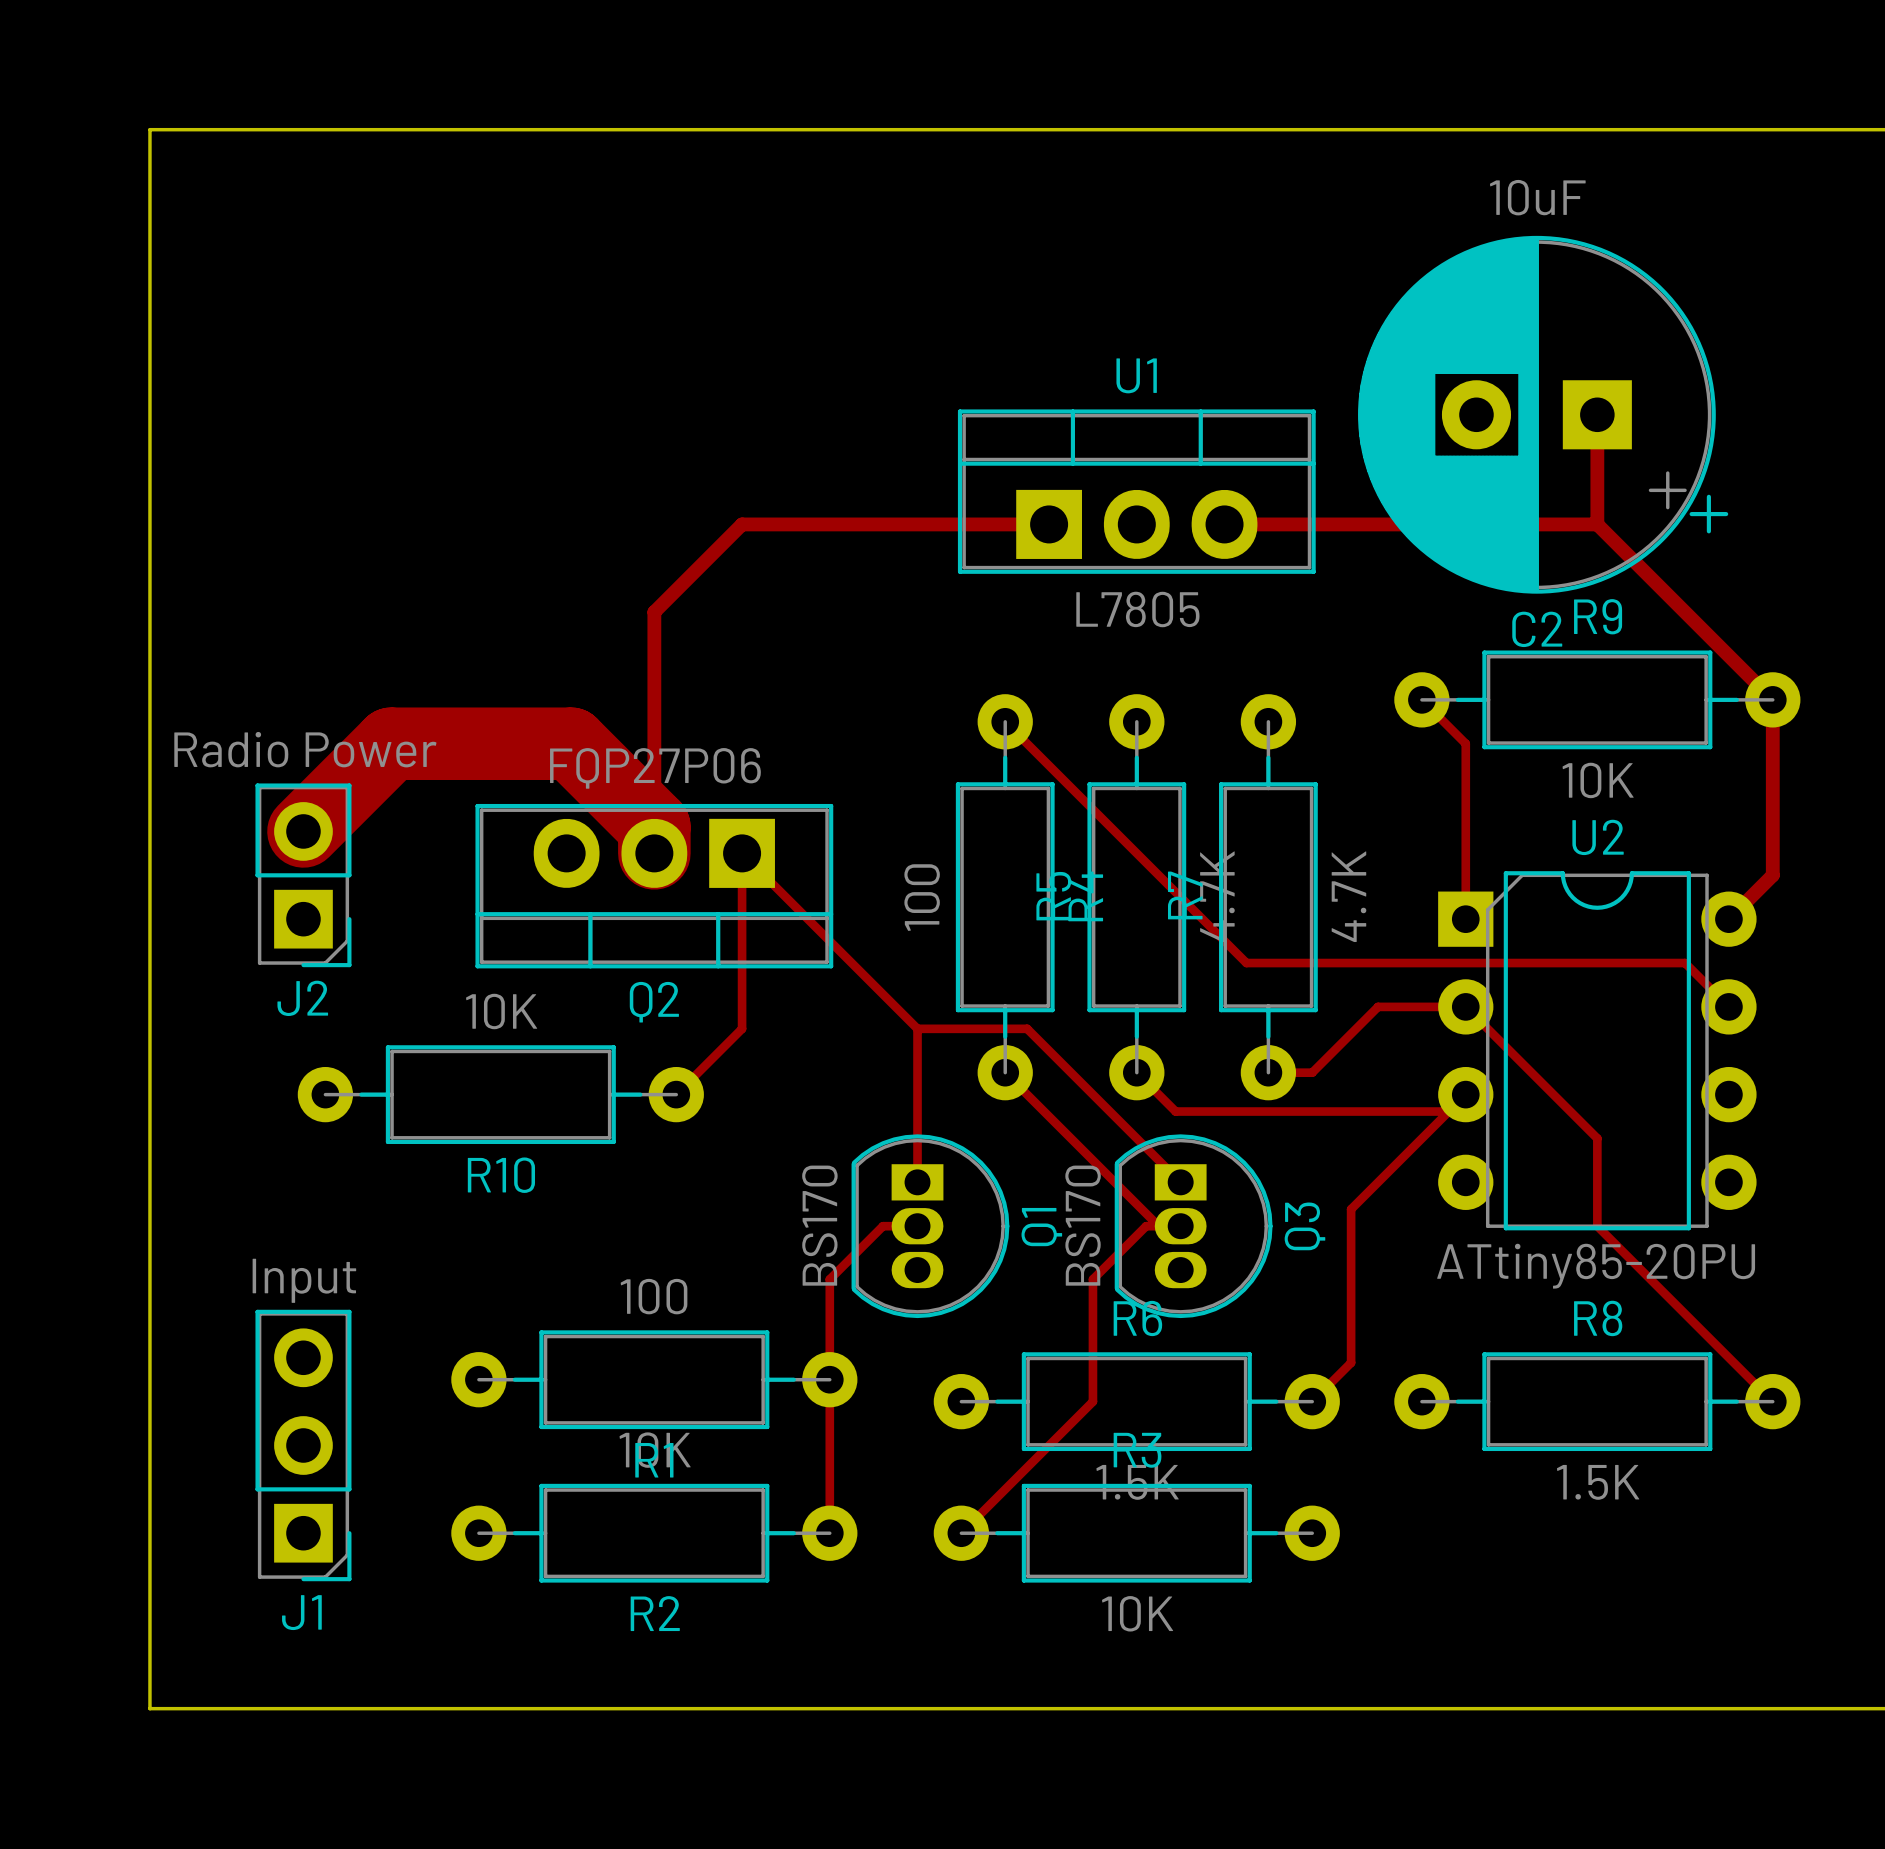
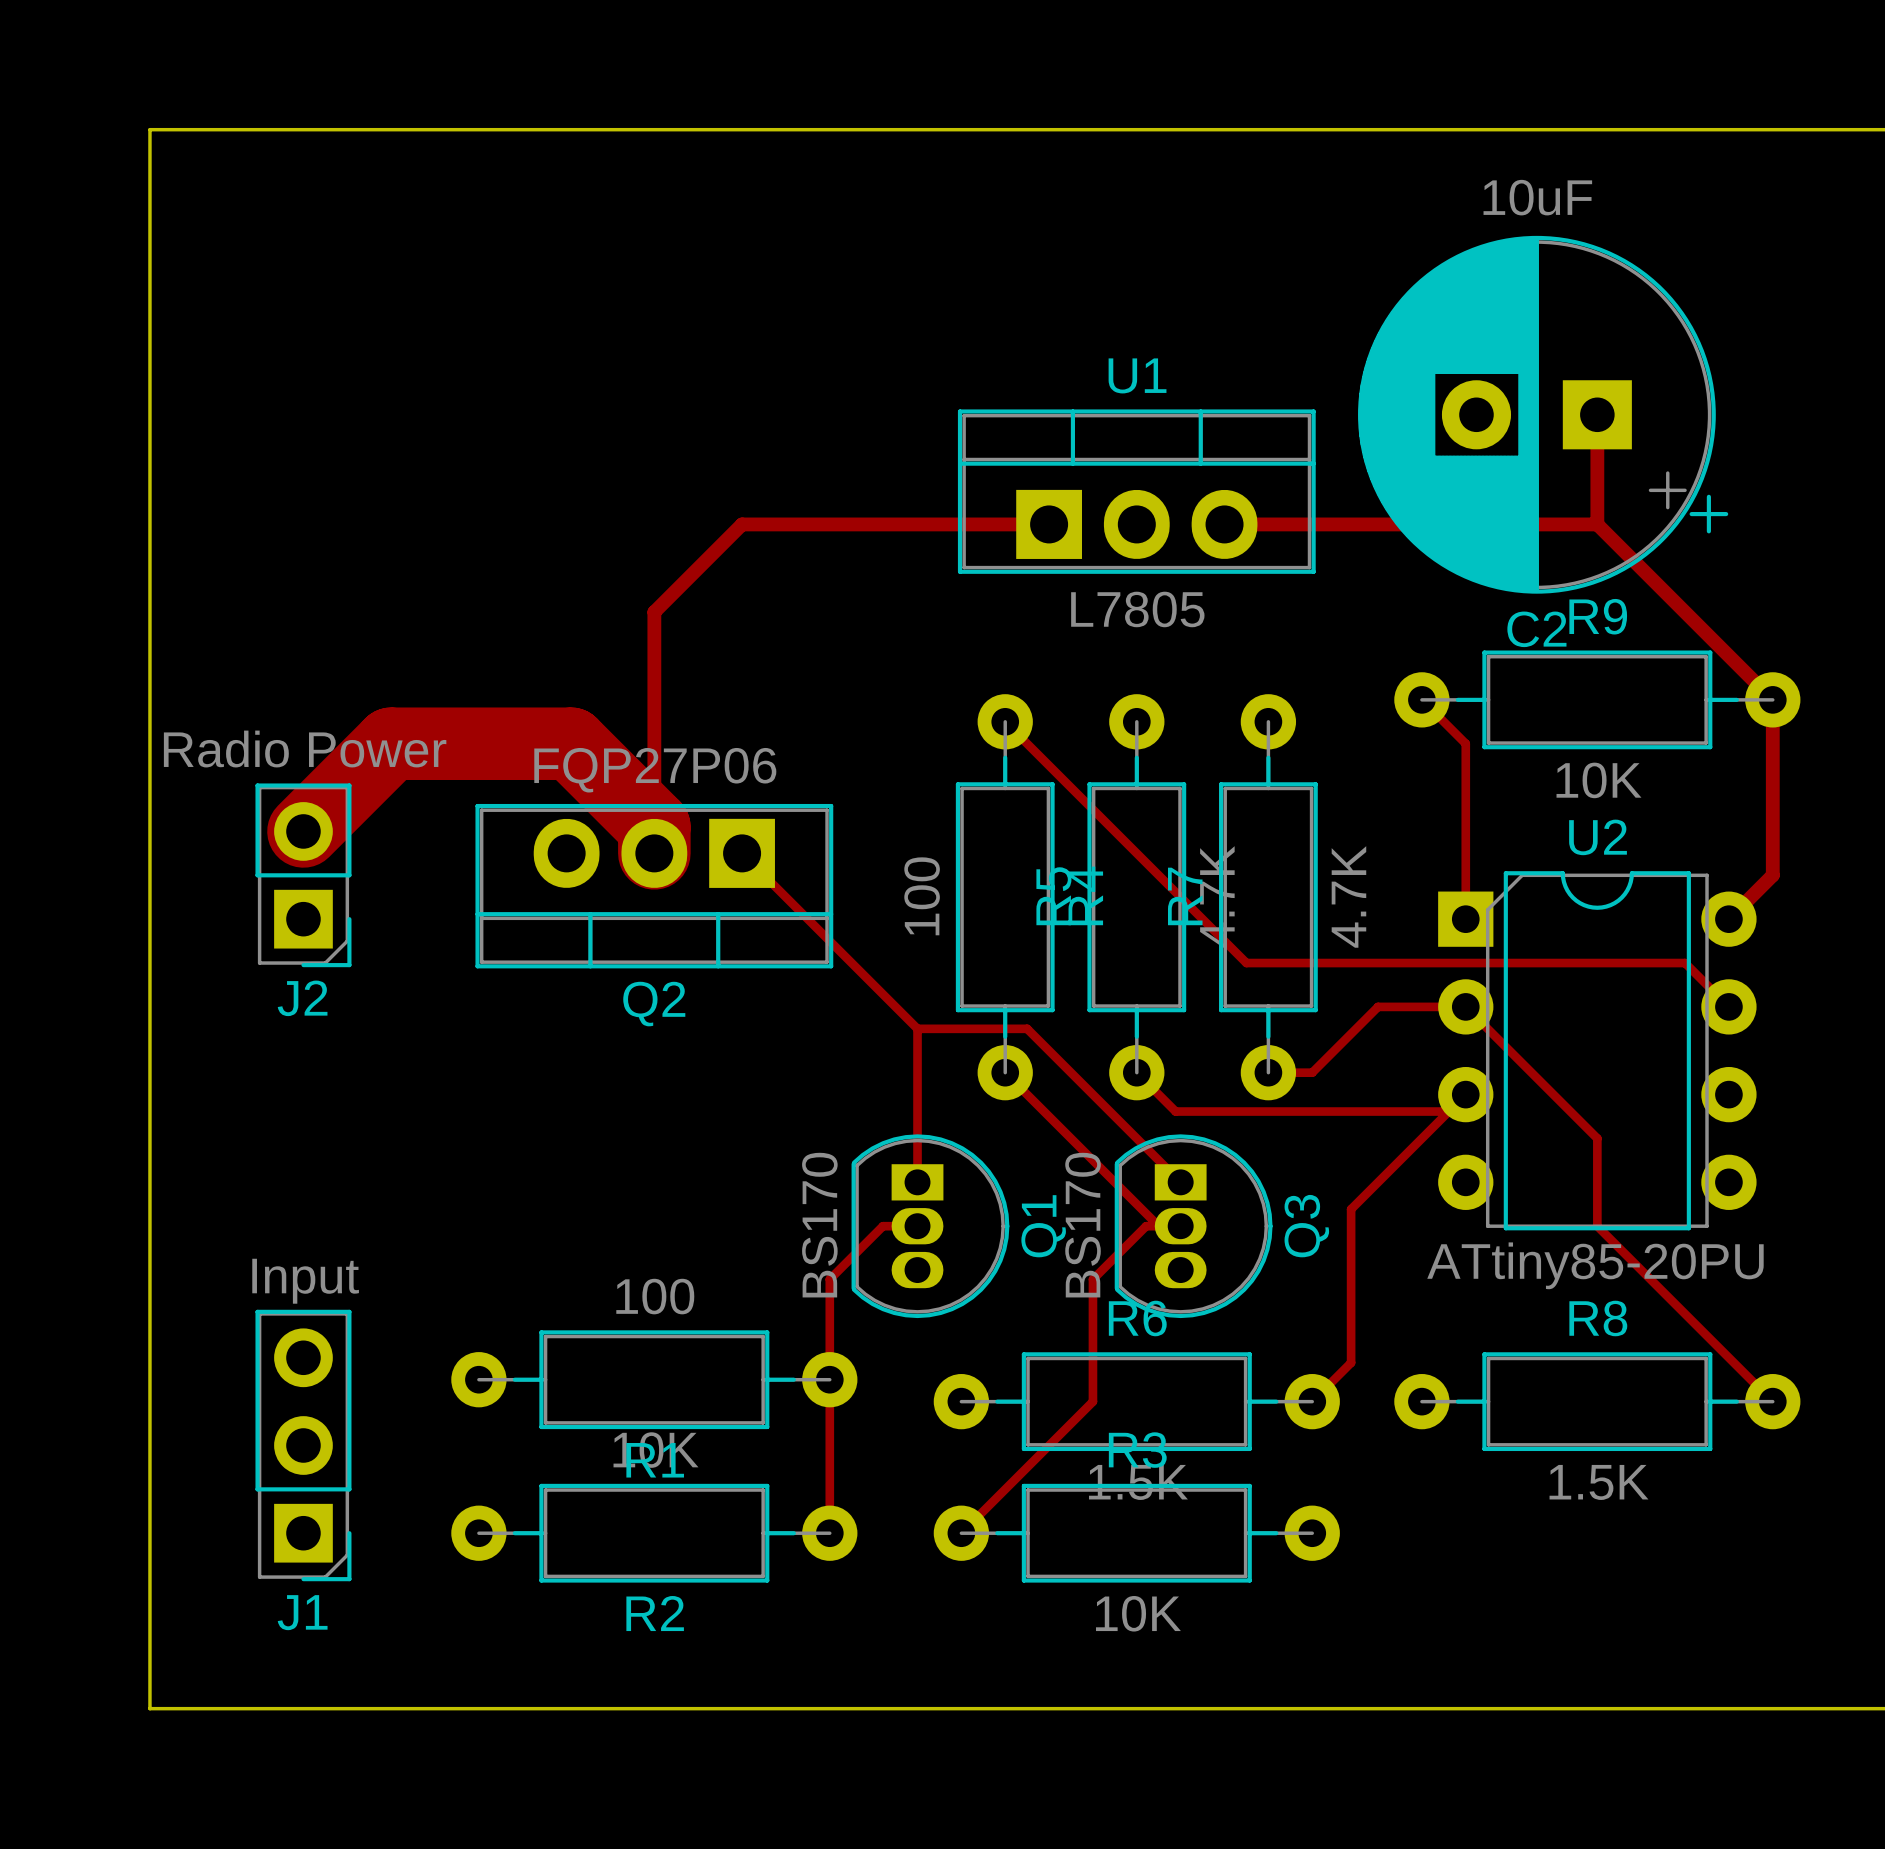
track: (742, 853) (742, 1028) (676, 1094) -> none
R10: 10K (500, 1094) -> none

